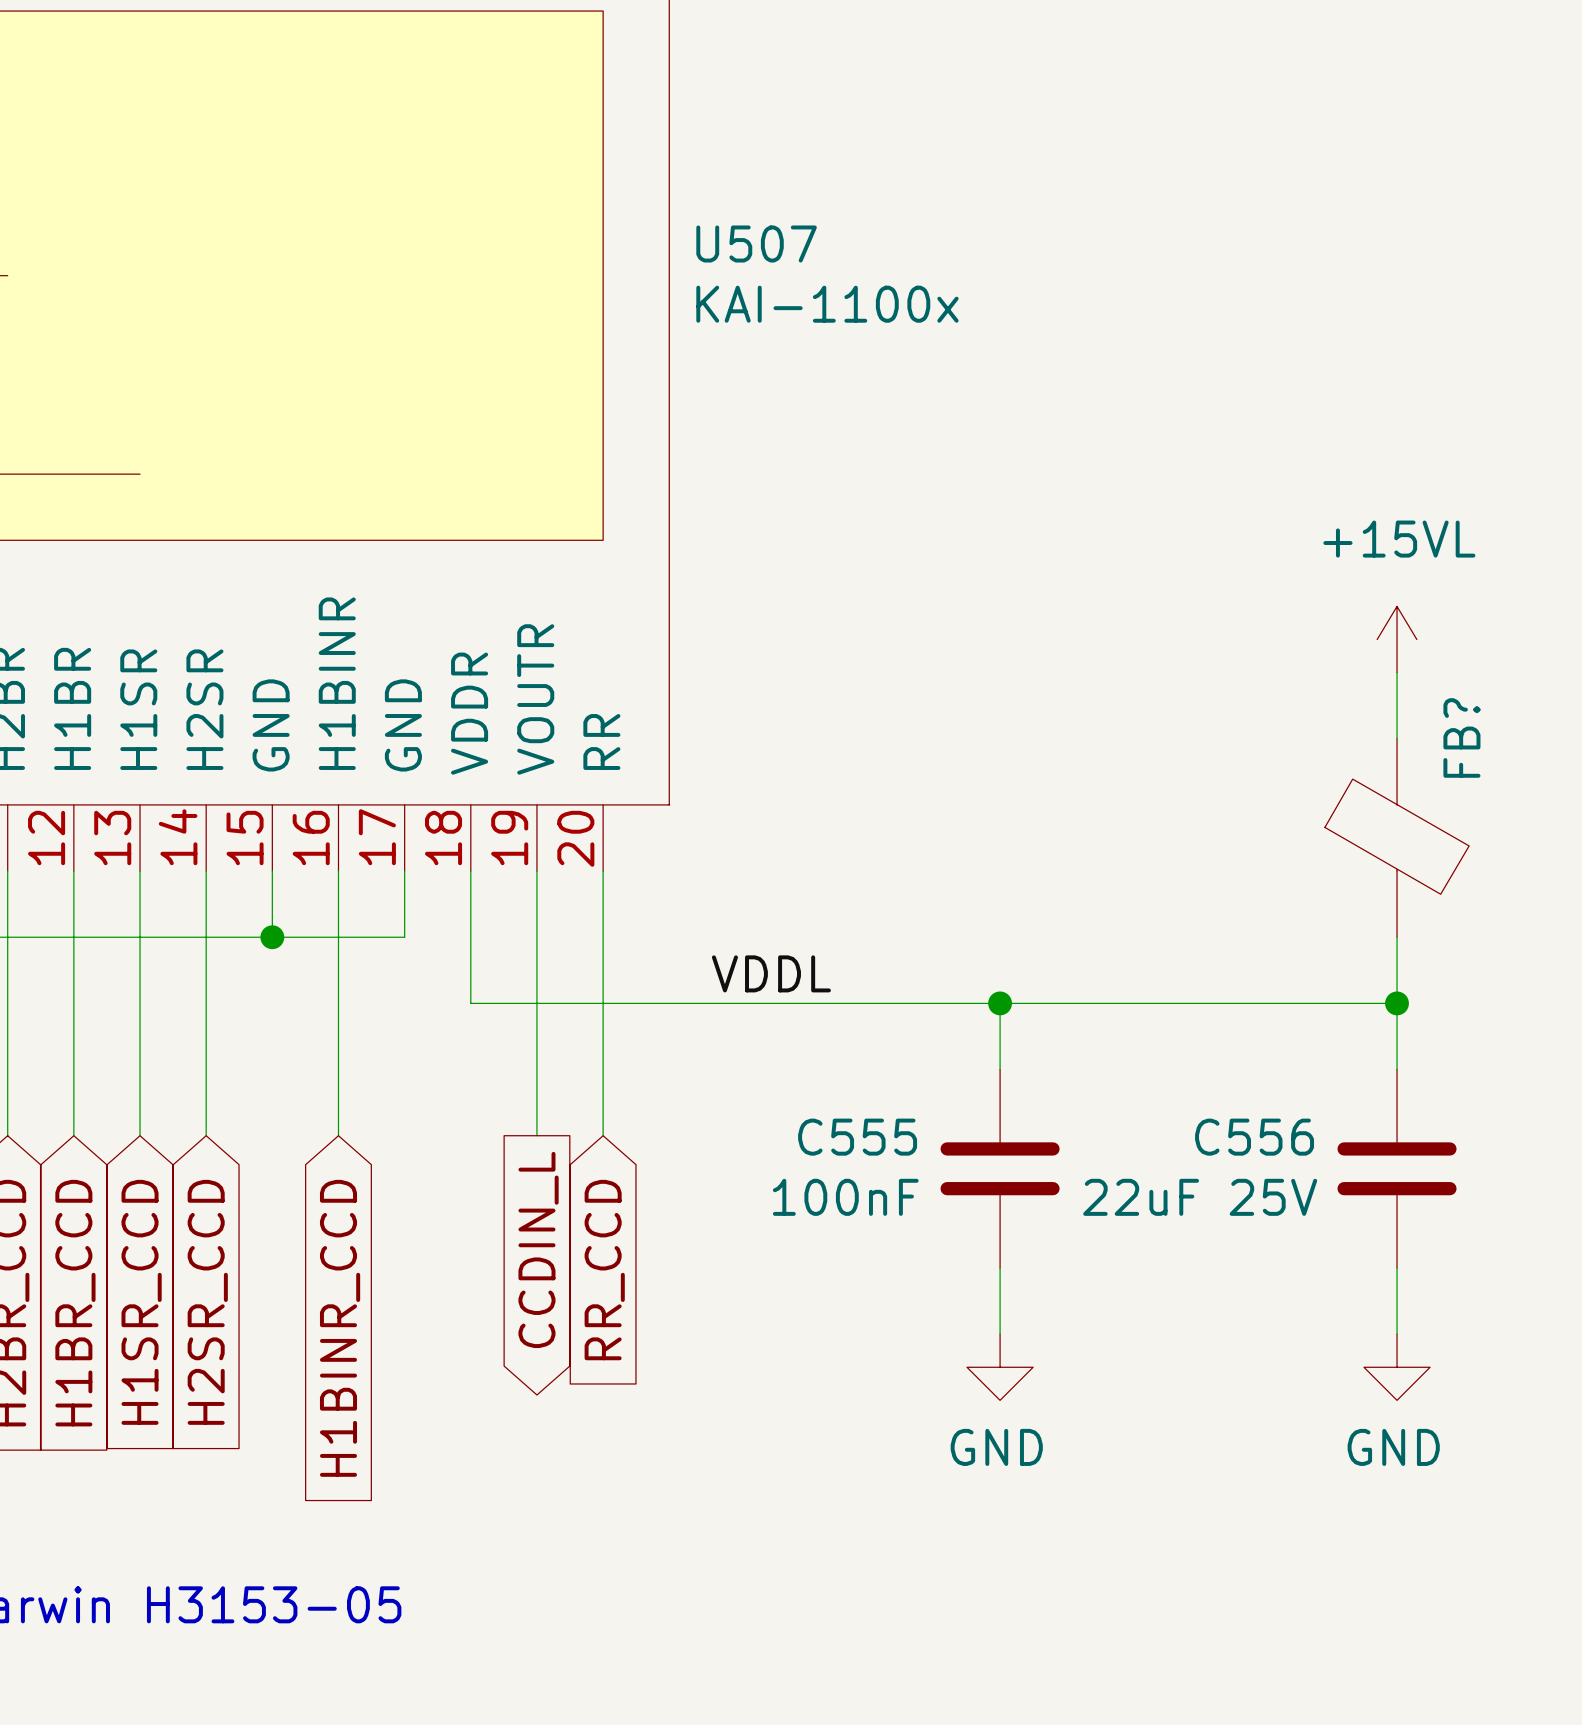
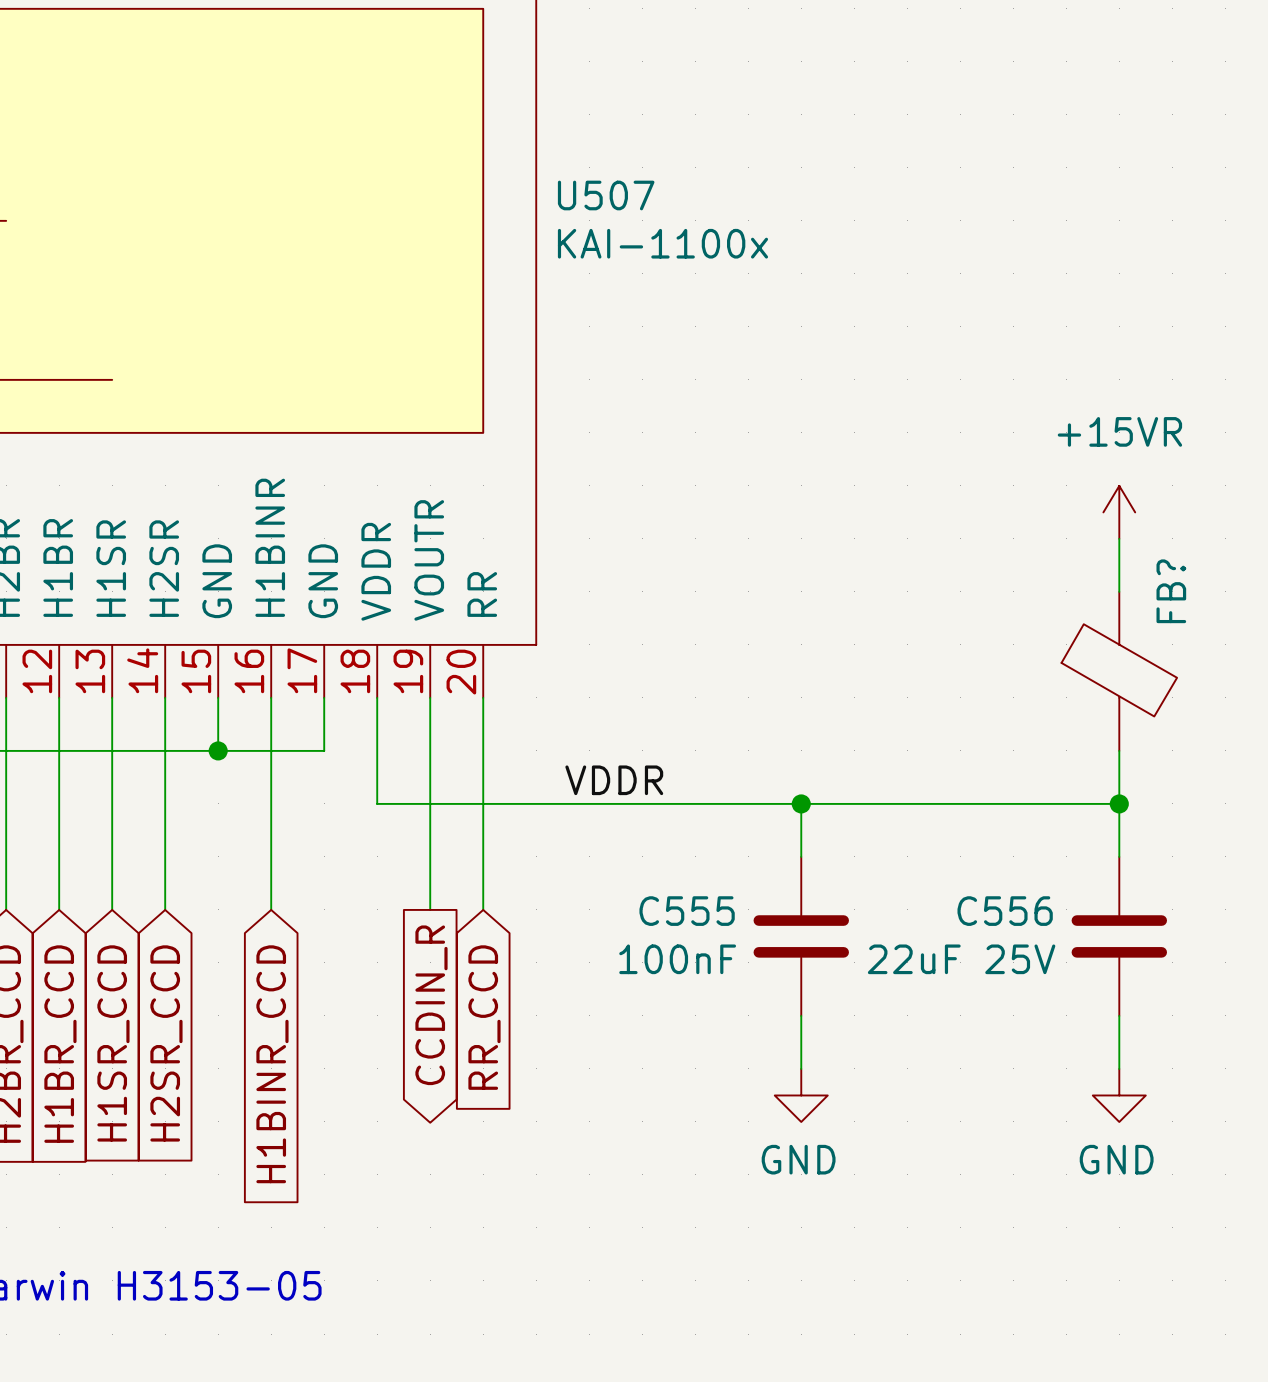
power symbol: +15VL (1397, 639) -> +15VR (1119, 512)
label: VDDL (771, 973) -> VDDR (614, 780)
global label: CCDIN_L (538, 1249) -> CCDIN_R (431, 1005)

